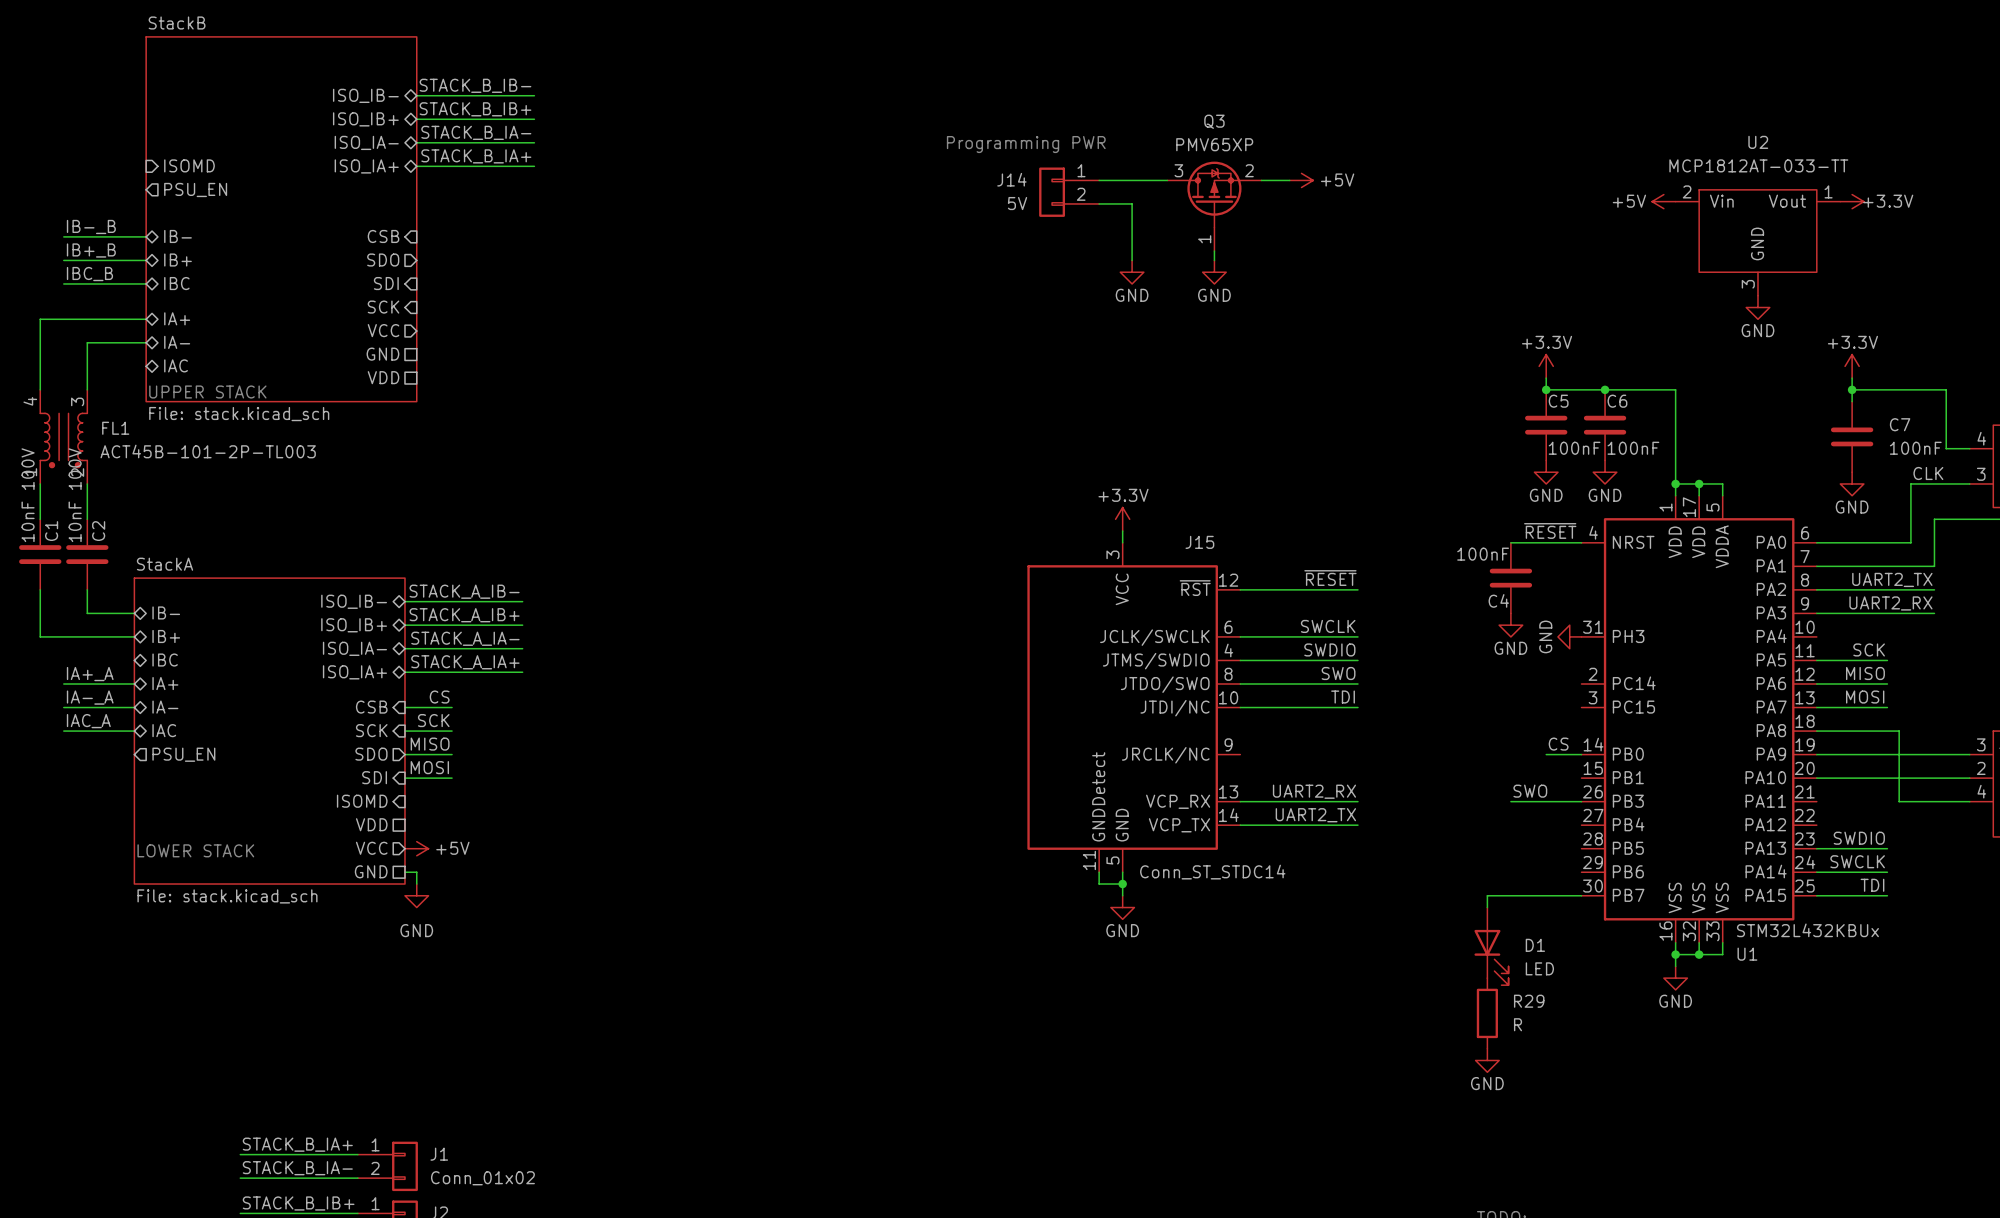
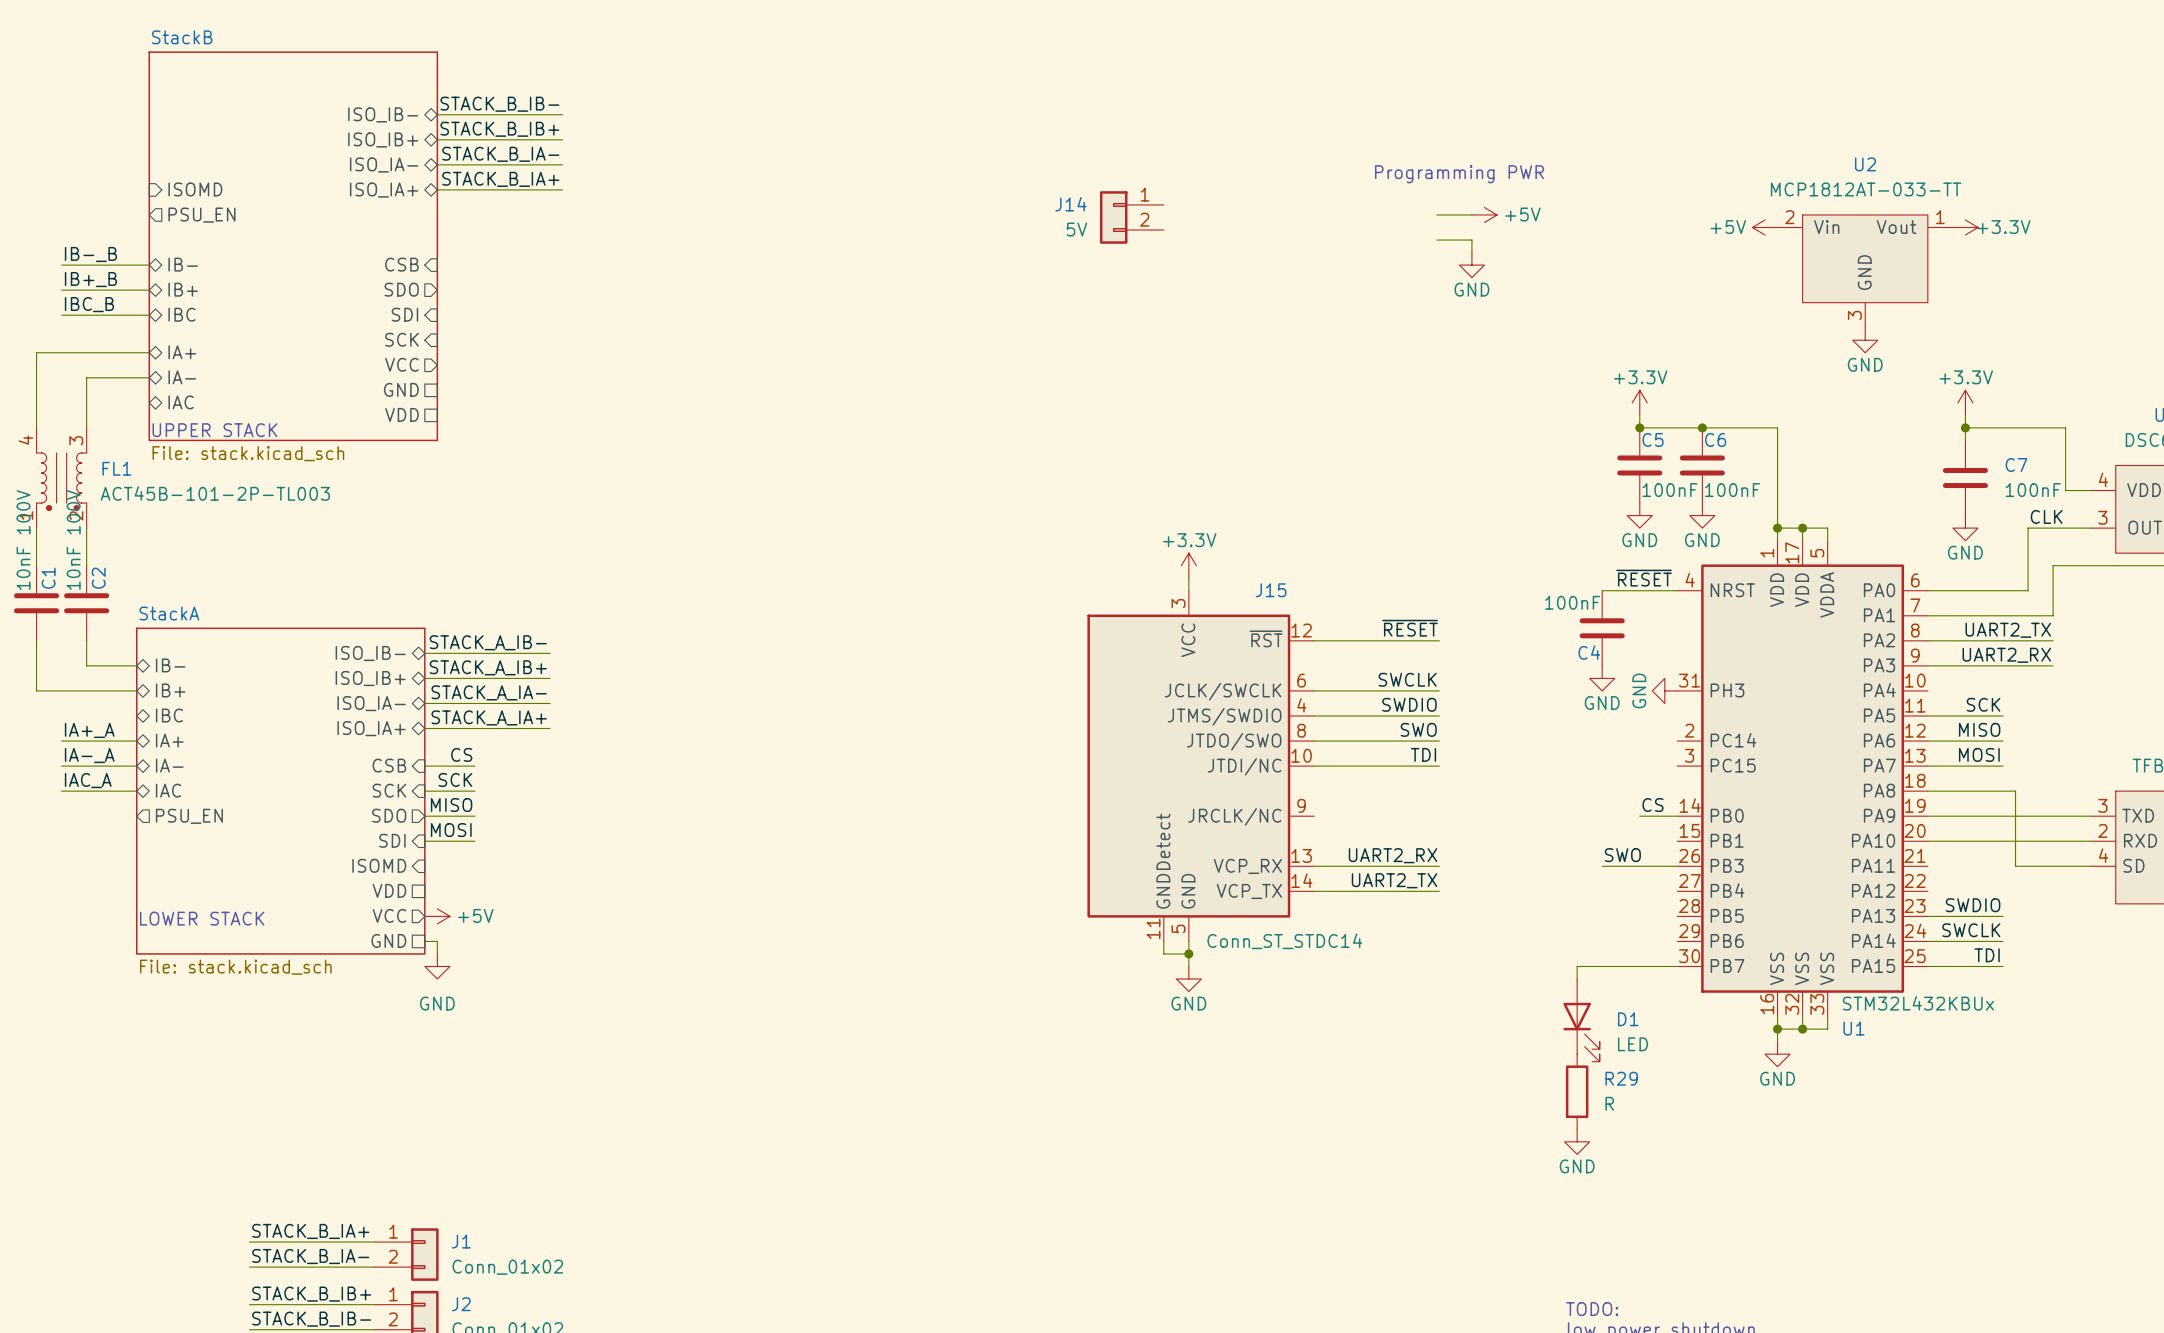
text: Programming PWR (1026, 144) -> none
text: none -> Programming PWR (1459, 174)
wire: (1099, 180) (1167, 180) -> none
wire: (1261, 180) (1289, 180) -> none
power symbol position: +5V (1301, 180) -> +5V (1484, 214)
wire: none -> (1436, 214) (1471, 214)
wire: (1099, 203) (1132, 203) (1132, 260) -> none
Q3: PMV65XP (1214, 206) -> none
wire: none -> (1436, 240) (1471, 240) (1471, 252)
power symbol: none -> GND (1471, 265)
wire: (1214, 251) (1214, 260) -> none
power symbol: GND (1132, 272) -> none
power symbol: GND (1214, 272) -> none

